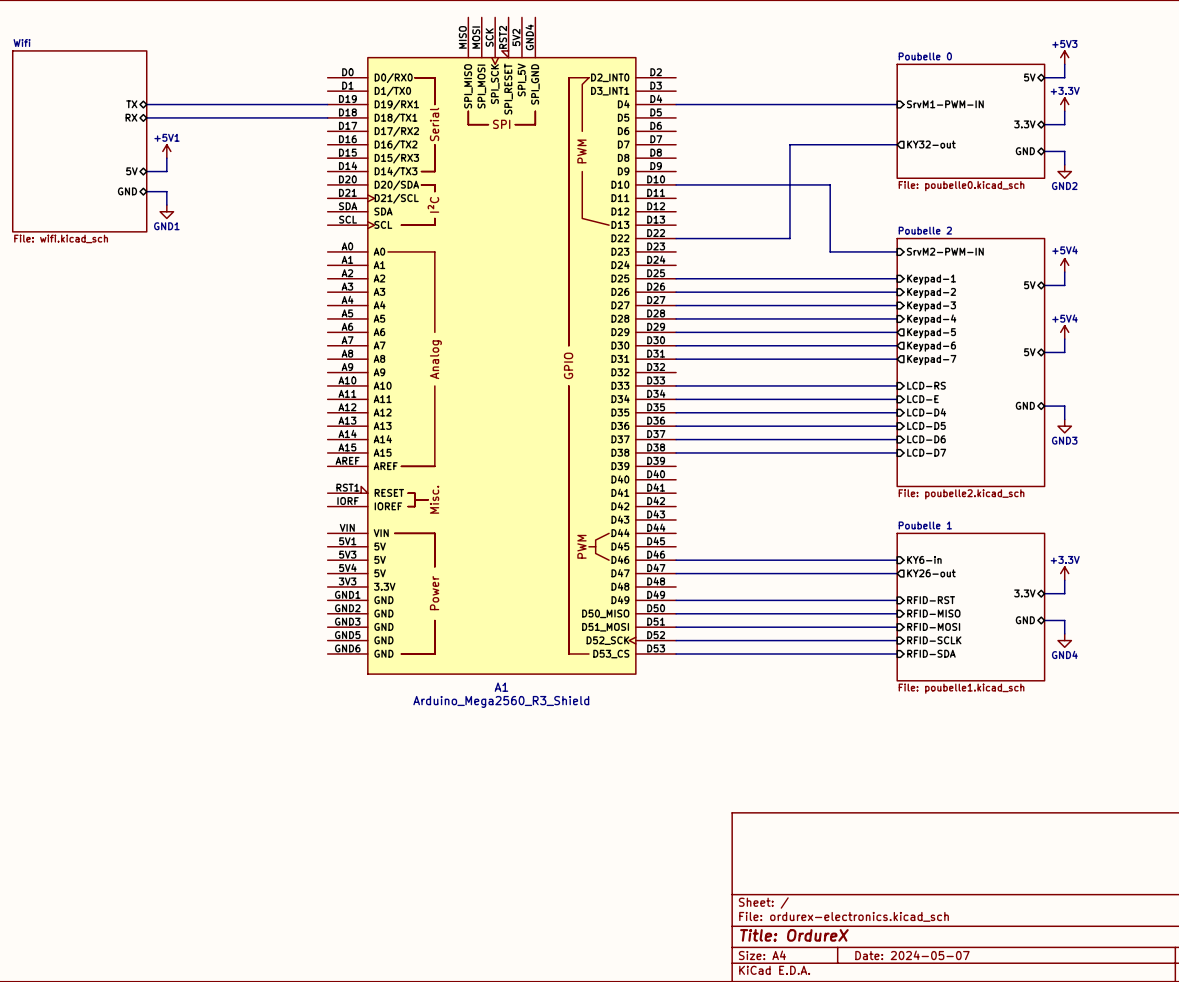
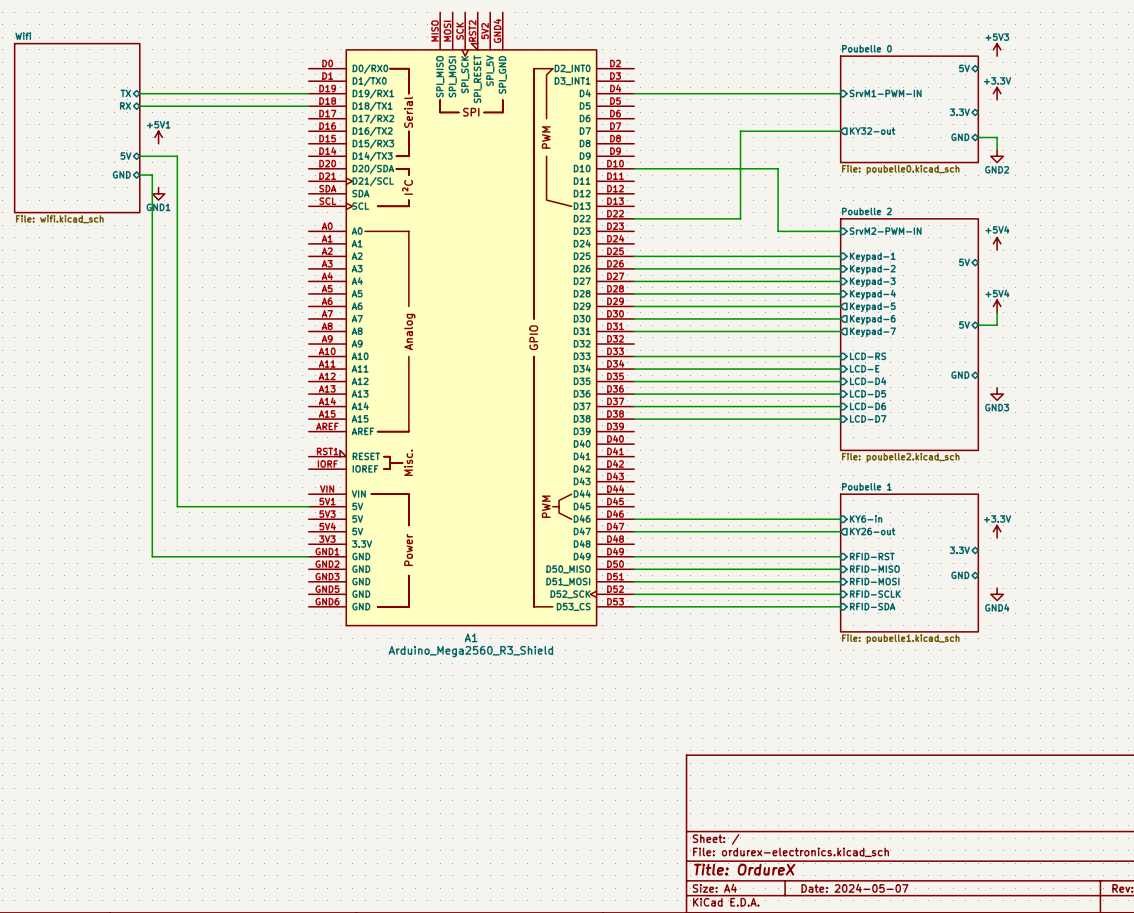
wire: (1064, 64) (1064, 77) (1044, 77) -> none
wire: (1064, 111) (1064, 124) (1044, 124) -> none
wire: (166, 158) (166, 171) -> (308, 506) (177, 506) (177, 156) (158, 156)
wire: (160, 191) (166, 191) (166, 205) -> (152, 175) (152, 556) (308, 556)
wire: (1064, 272) (1064, 285) (1044, 285) -> none
wire: (1044, 406) (1064, 406) (1064, 419) -> none
wire: (1064, 580) (1064, 593) (1044, 593) -> none
wire: (1044, 620) (1064, 620) (1064, 633) -> none

